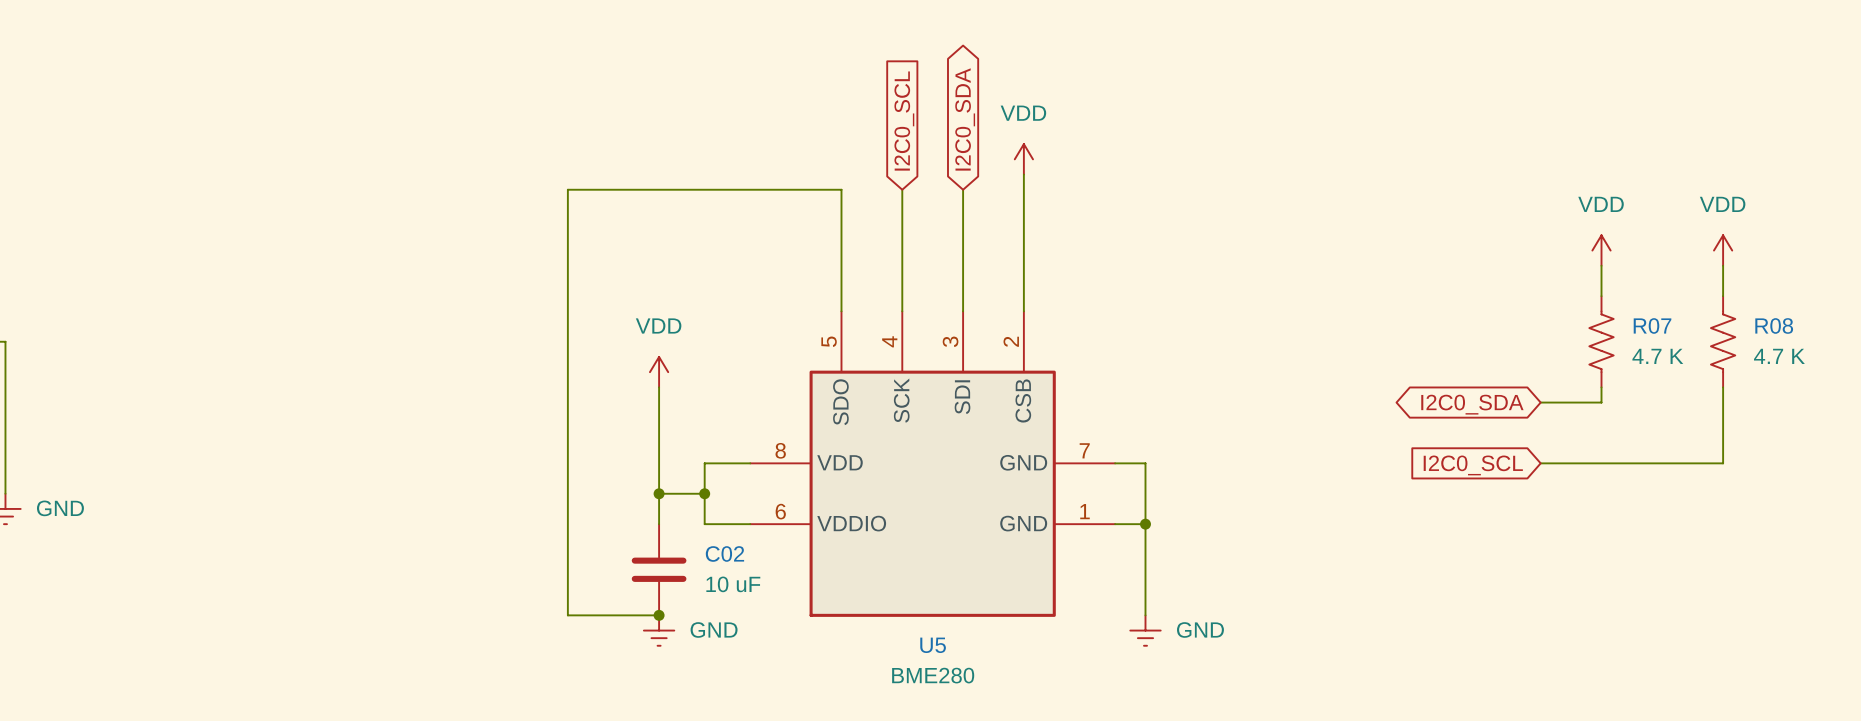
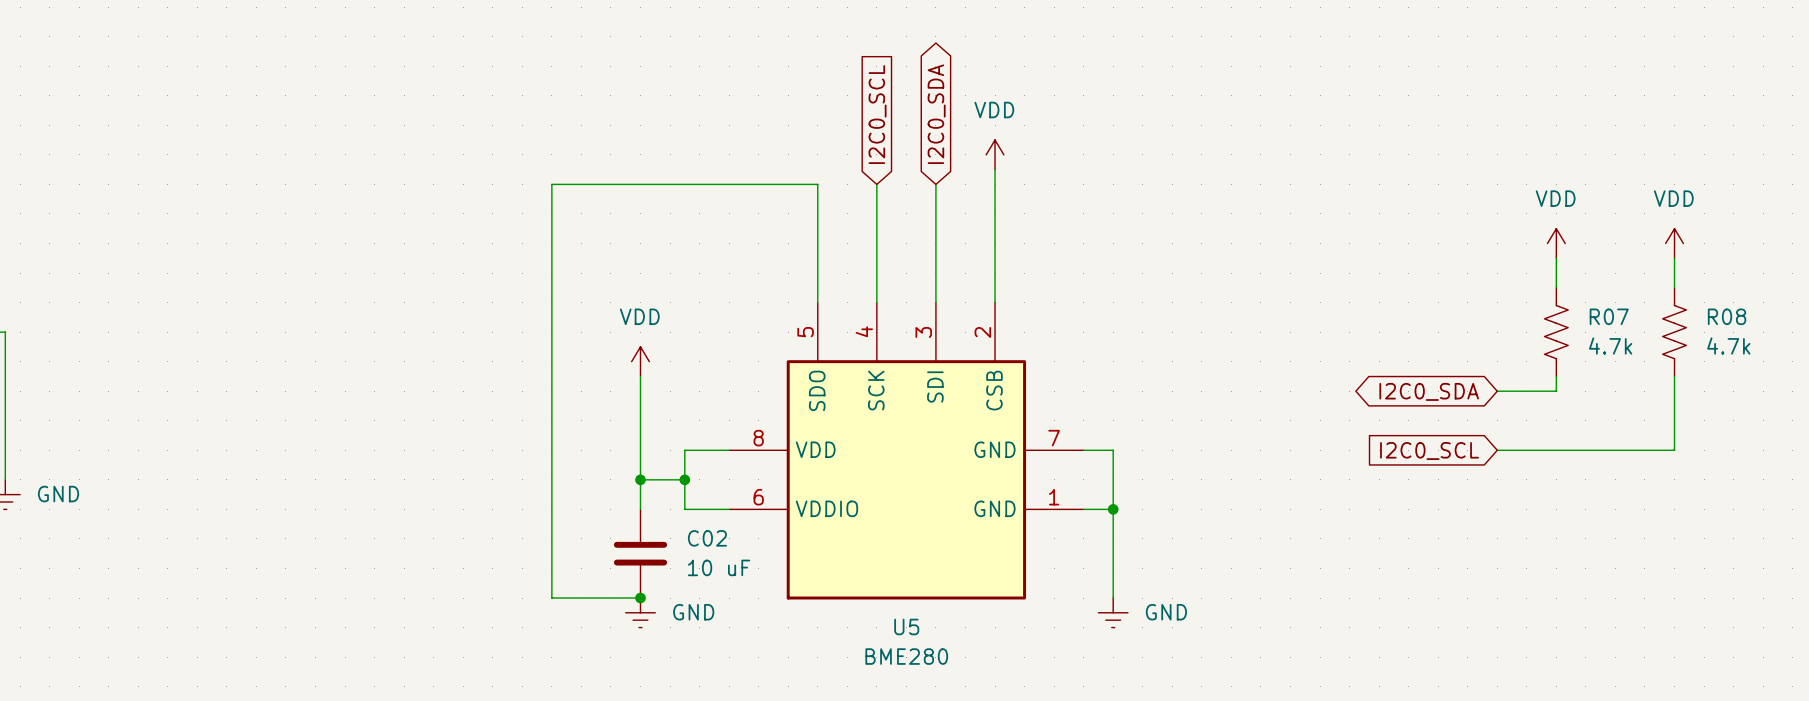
R07 value: 4.7 K (1657, 356) -> 4.7k (1610, 345)
R08 value: 4.7 K (1779, 356) -> 4.7k (1728, 345)

